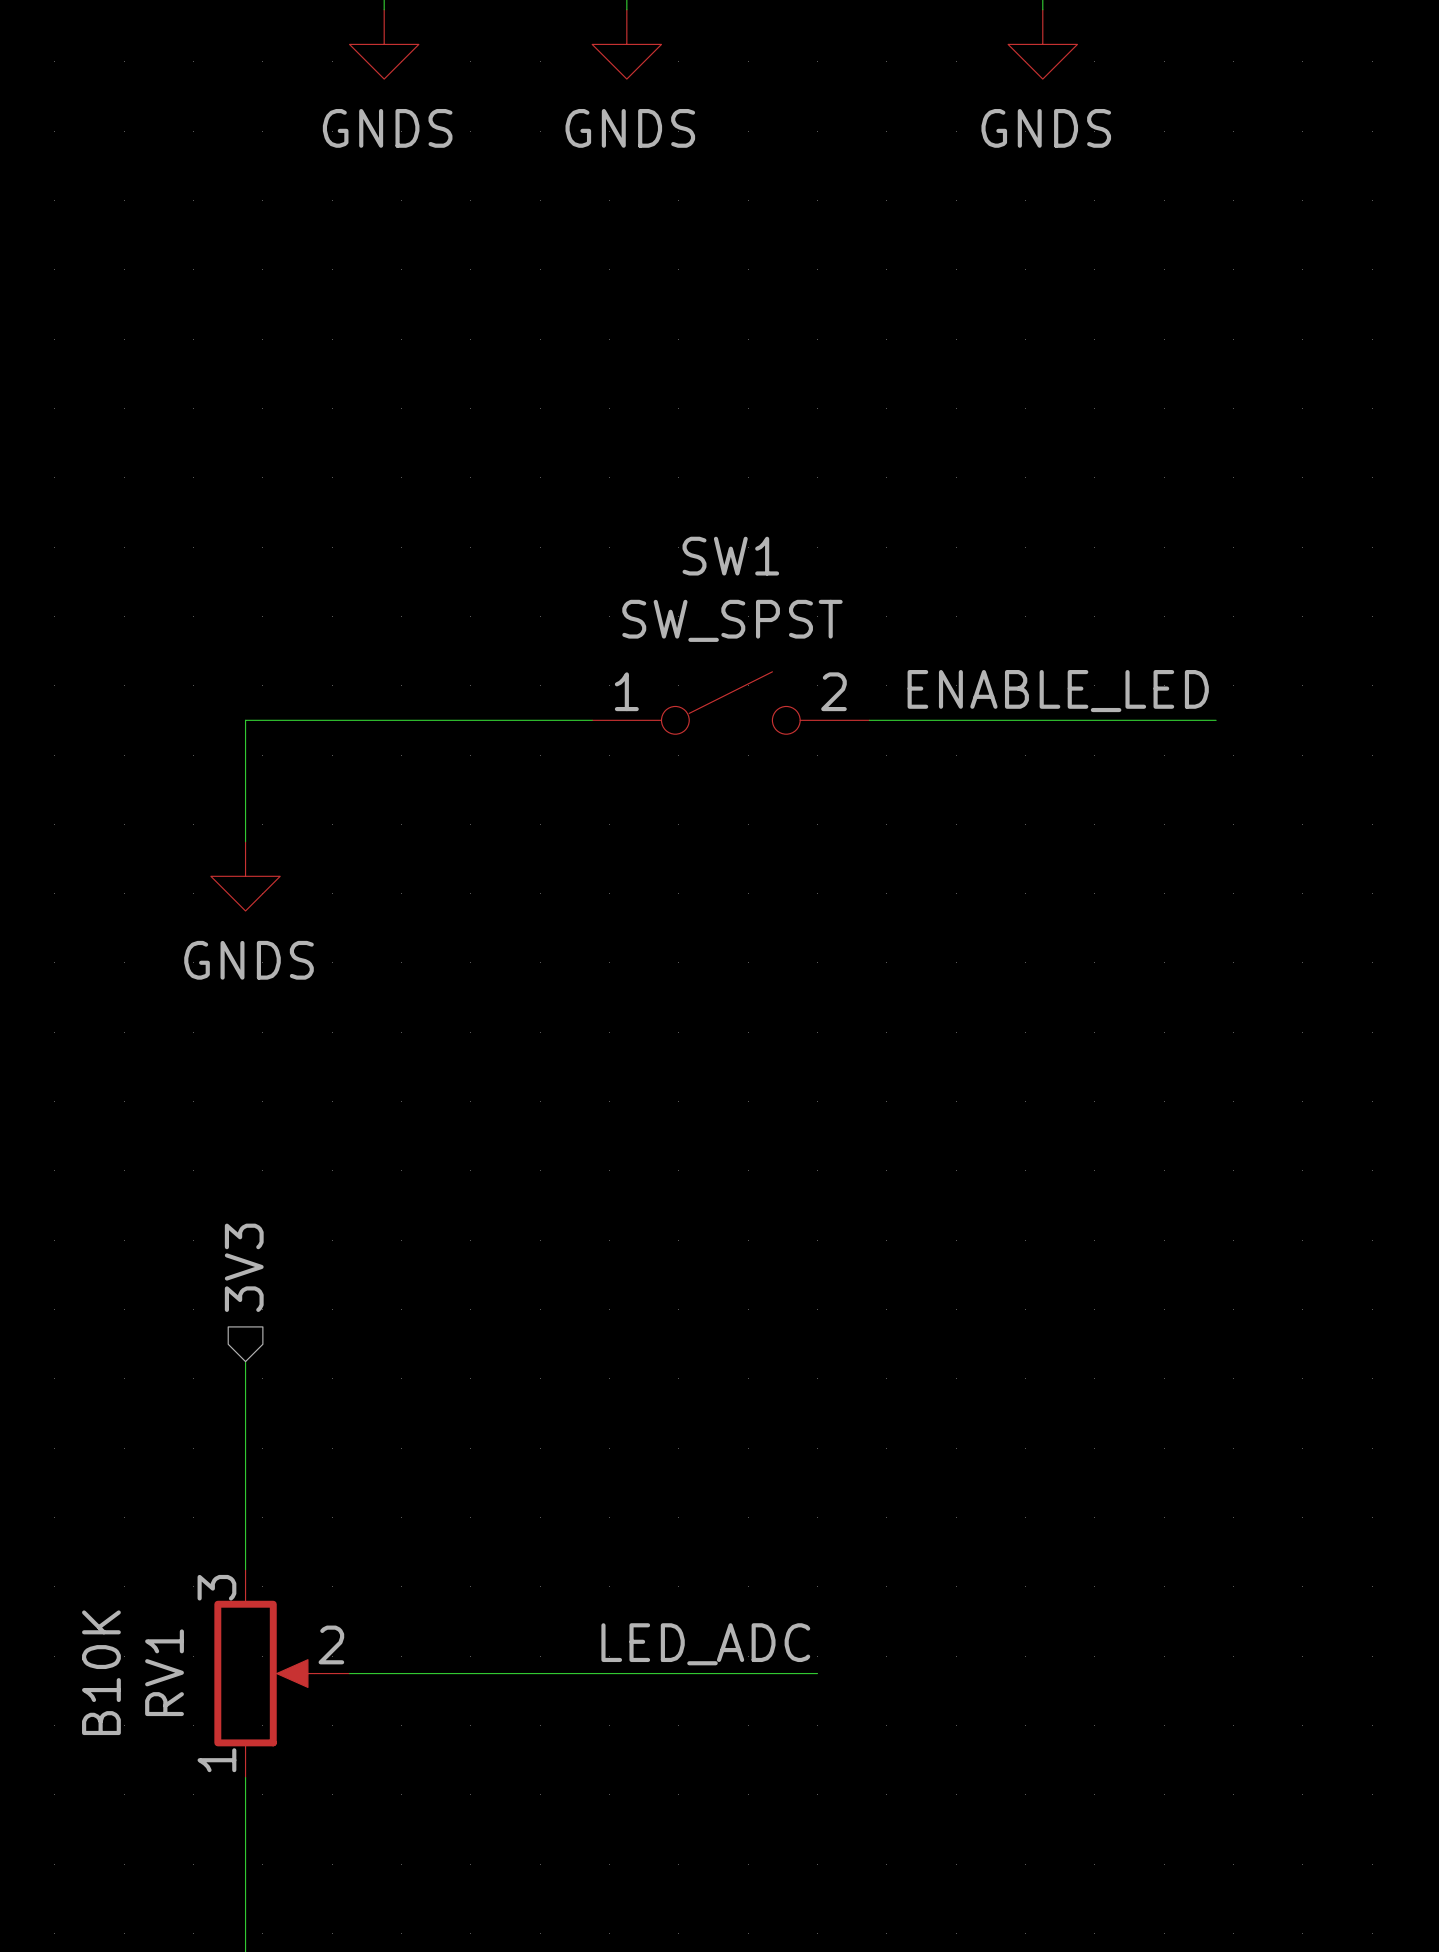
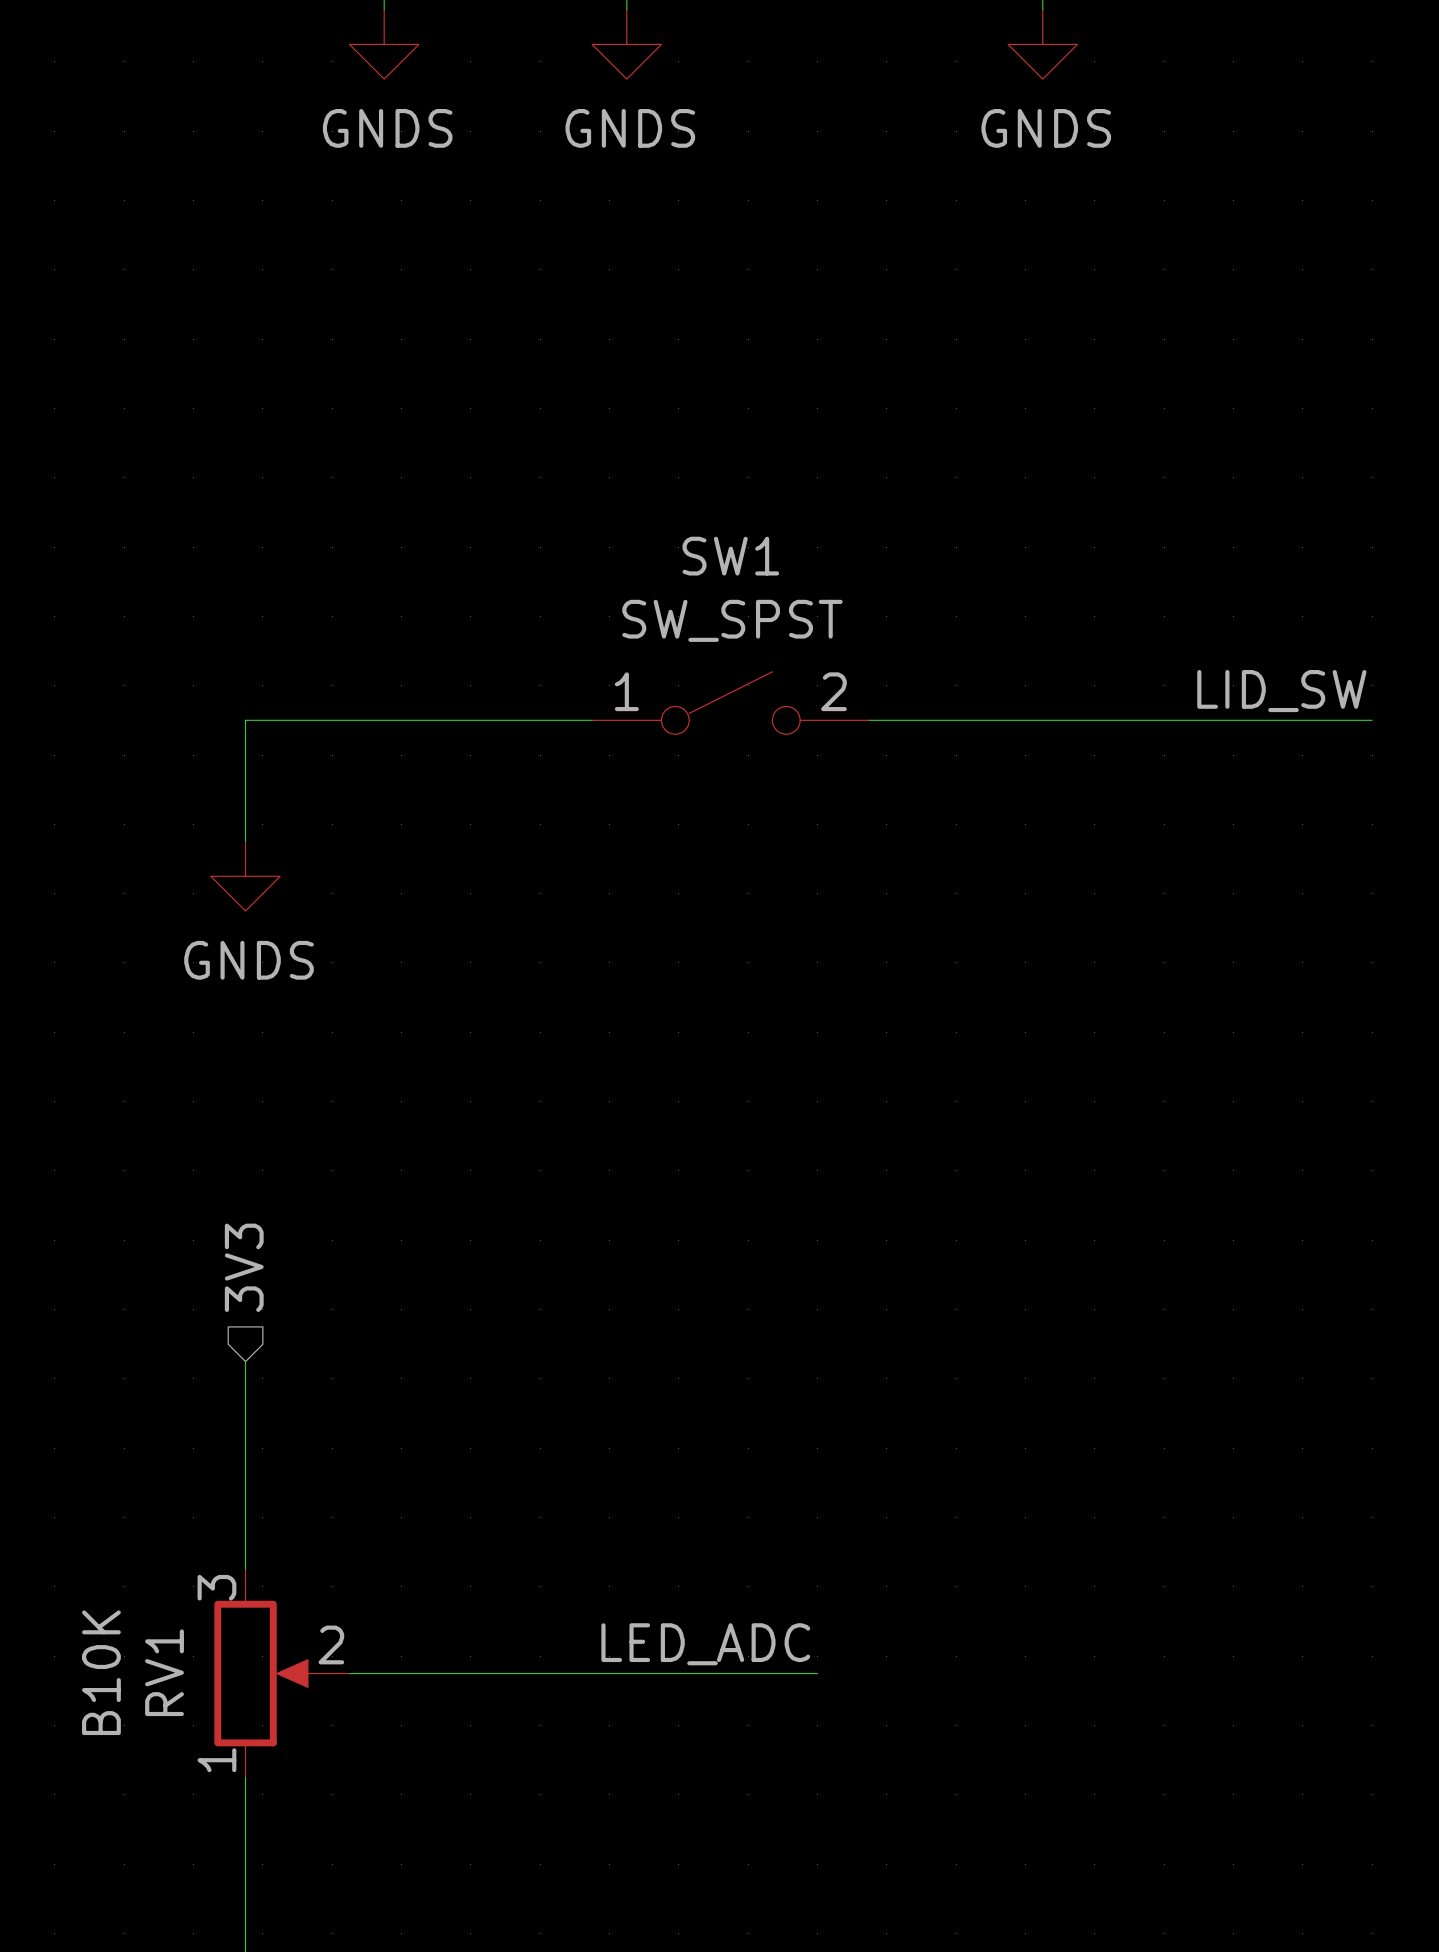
label: ENABLE_LED (1058, 691) -> none
label: none -> LID_SW (1281, 691)
wire: none -> (1216, 720) (1372, 720)

